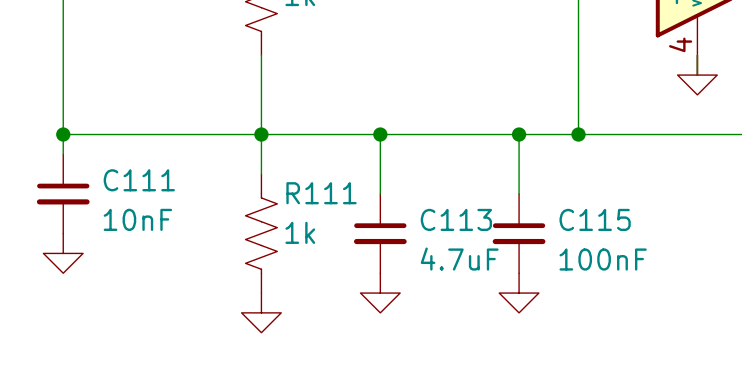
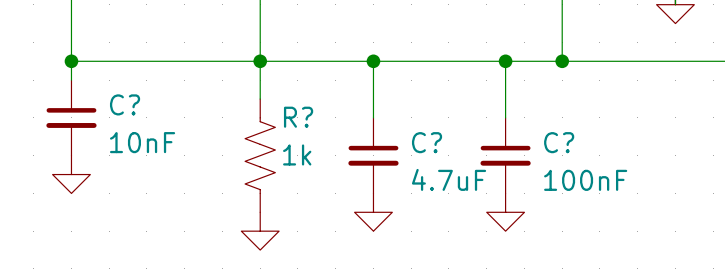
C111 name: C111 (139, 180) -> C? (125, 104)
R111 name: R111 (321, 193) -> R? (298, 117)
C113 name: C113 (456, 219) -> C? (427, 142)
C115 name: C115 (595, 219) -> C? (559, 142)

